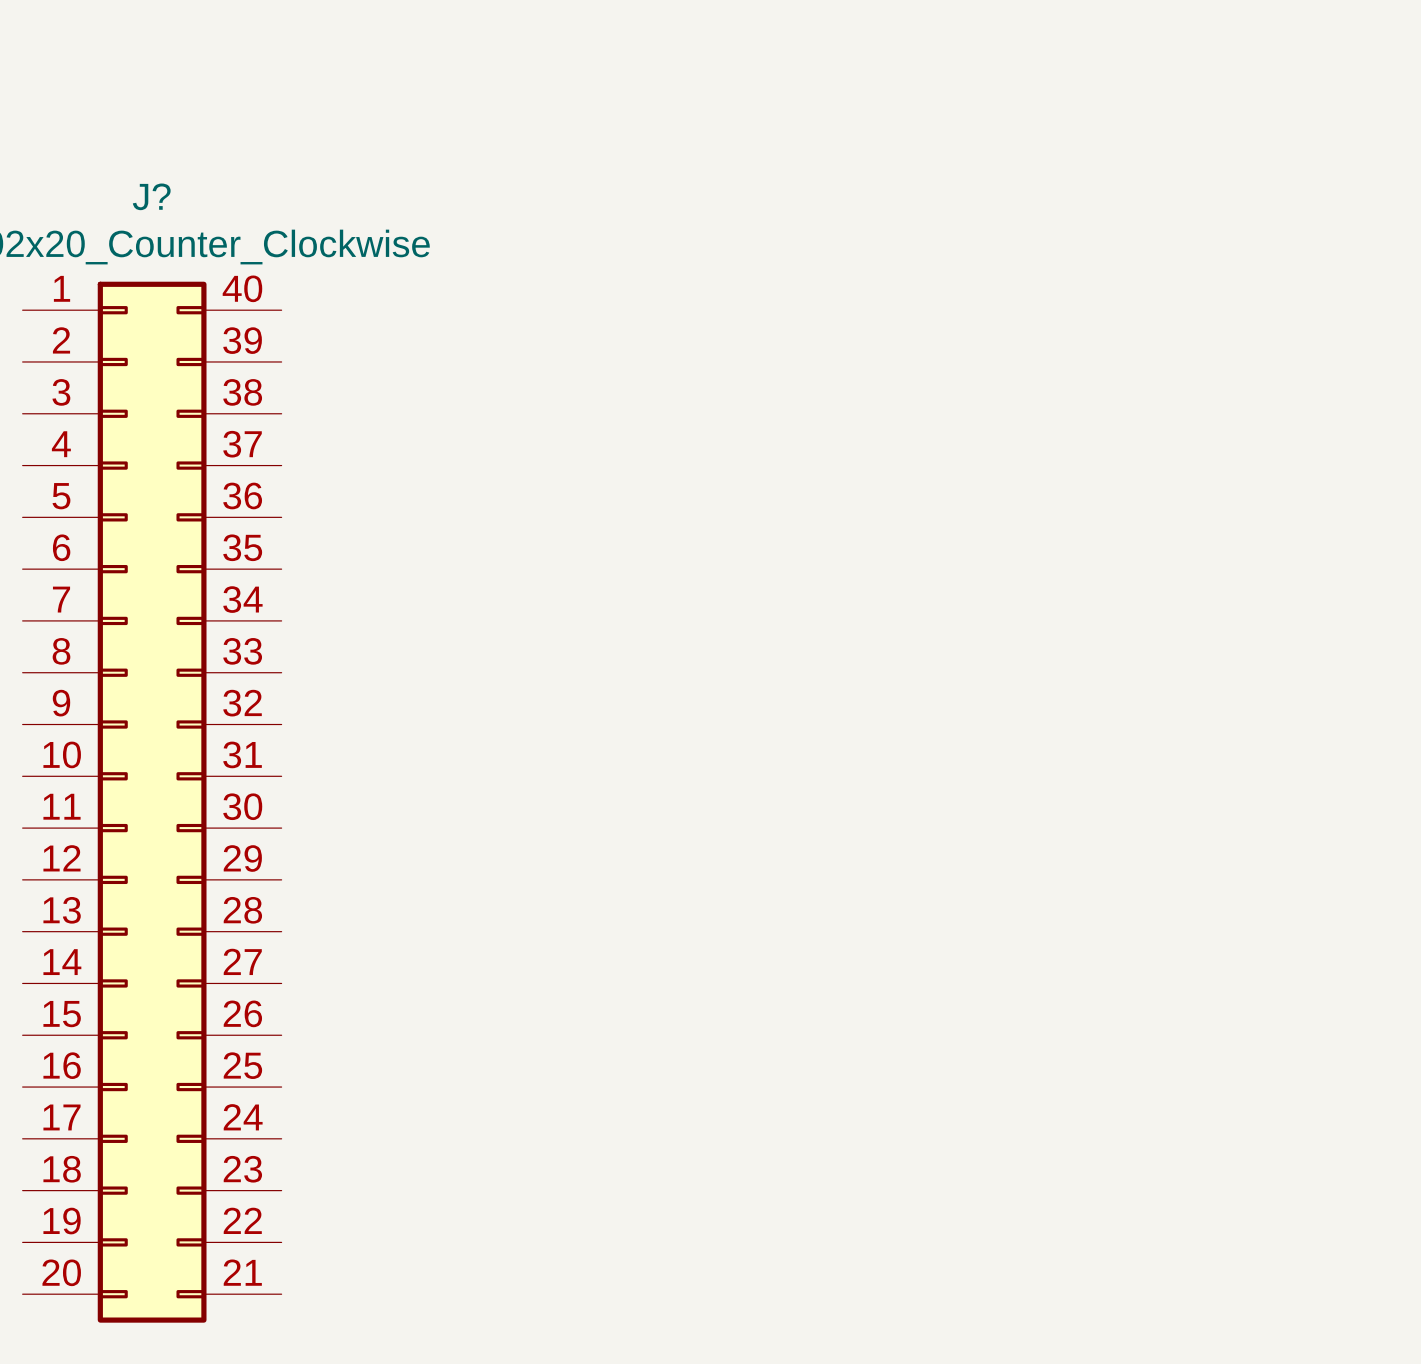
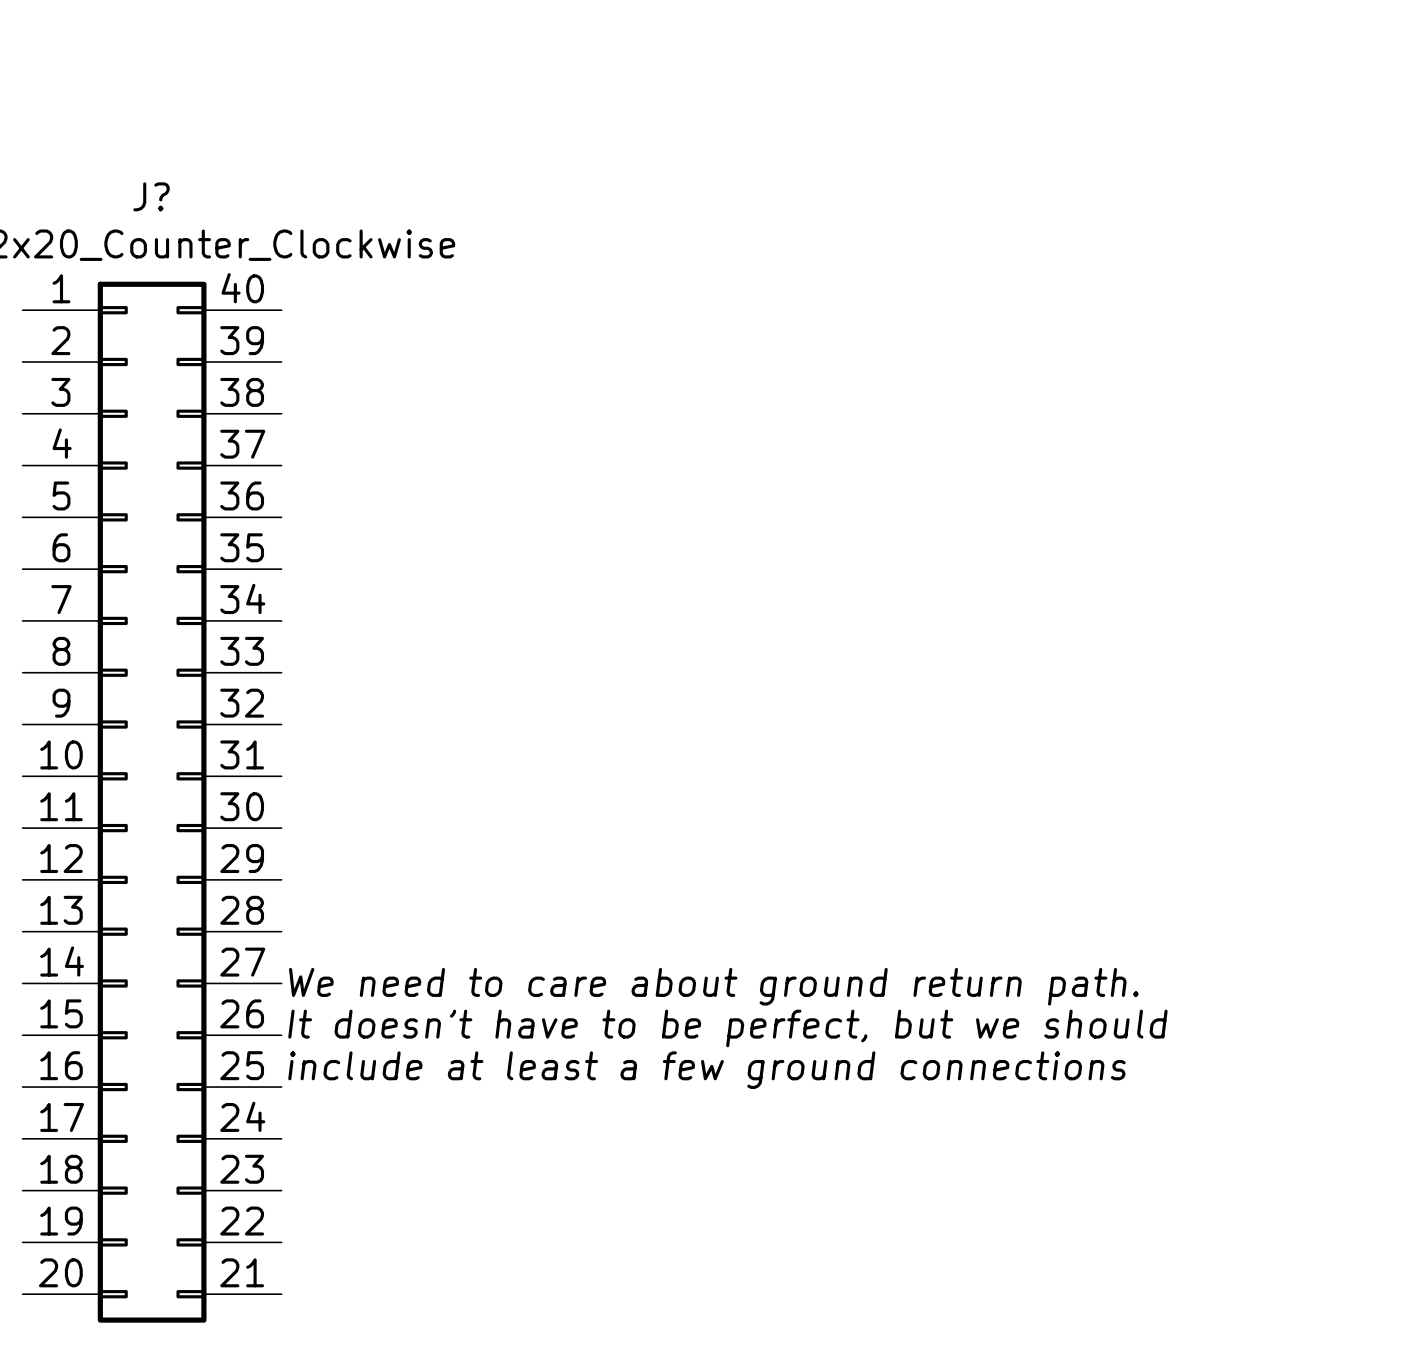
text: none -> We need to care about ground return path. (713, 986)
text: none -> It doesn’t have to be perfect, but we should (727, 1028)
text: none -> include at least a few ground connections (706, 1070)

